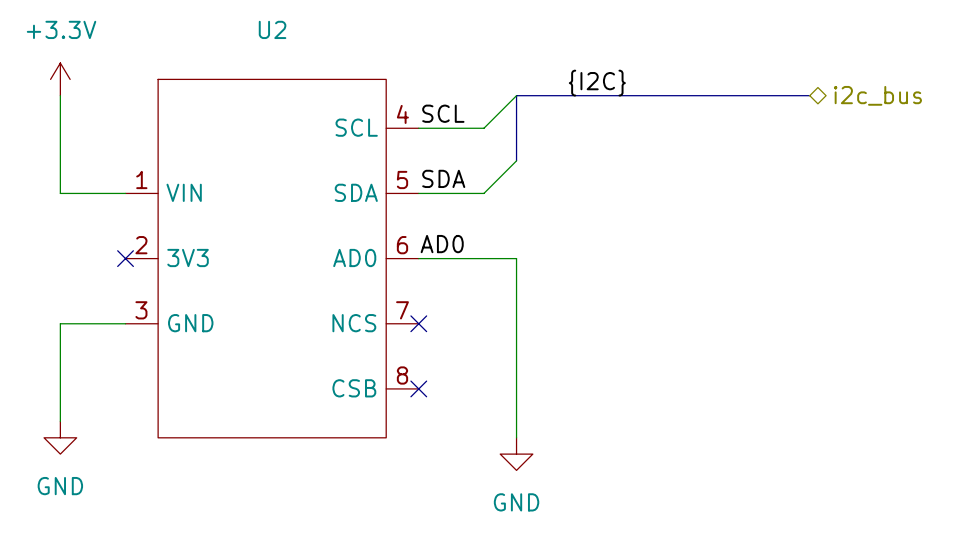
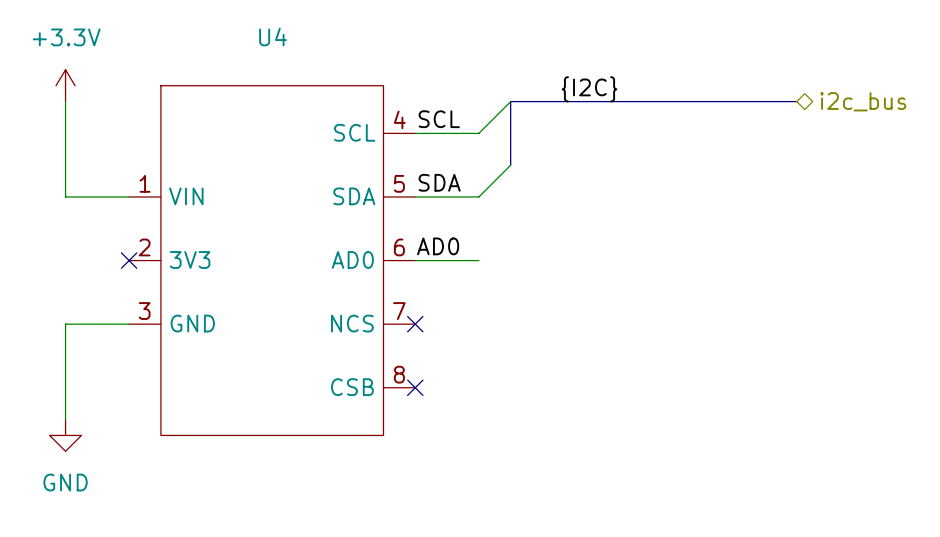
U2 name: U2 (272, 29) -> U4 (272, 37)
wire: (483, 258) (516, 258) (516, 437) -> none
power symbol: GND (516, 454) -> none

